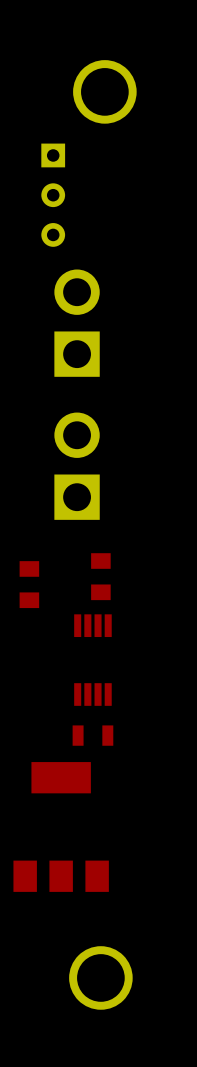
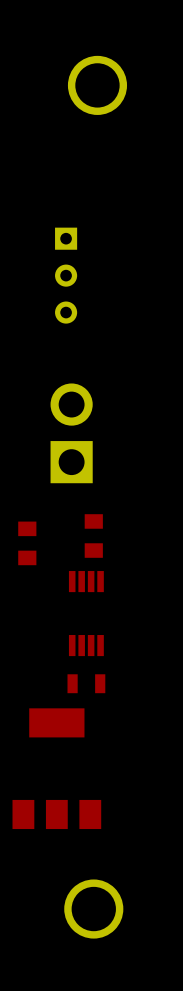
part position: (53, 195) -> (66, 275)
part: (77, 323) -> none

